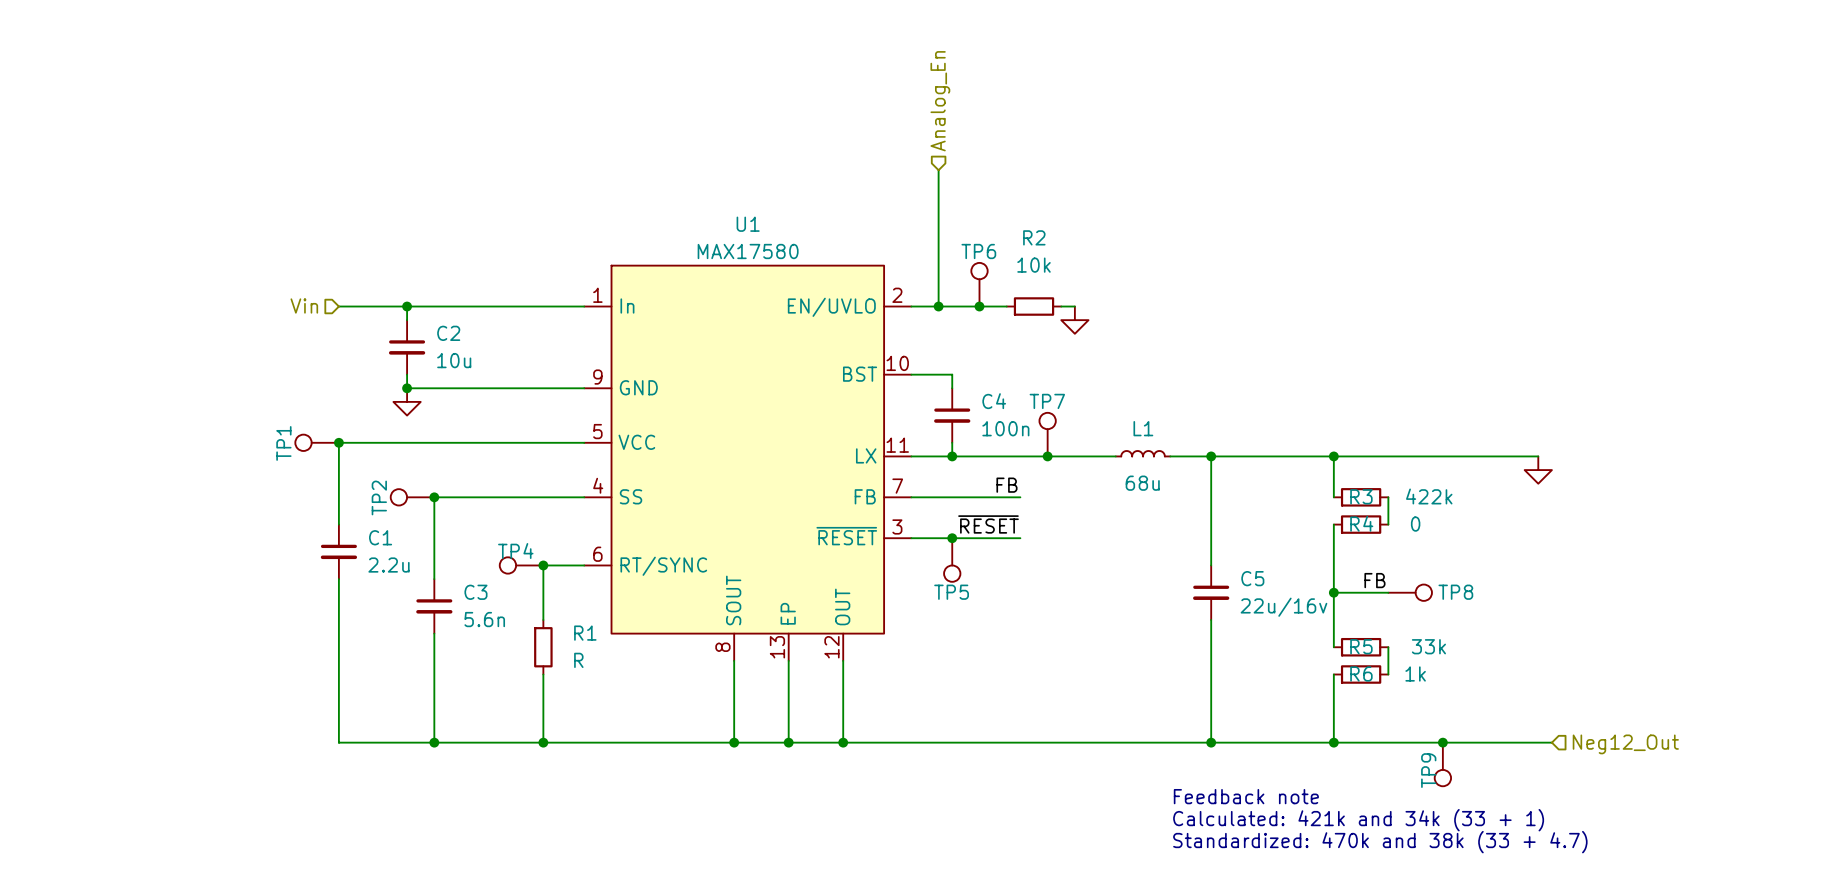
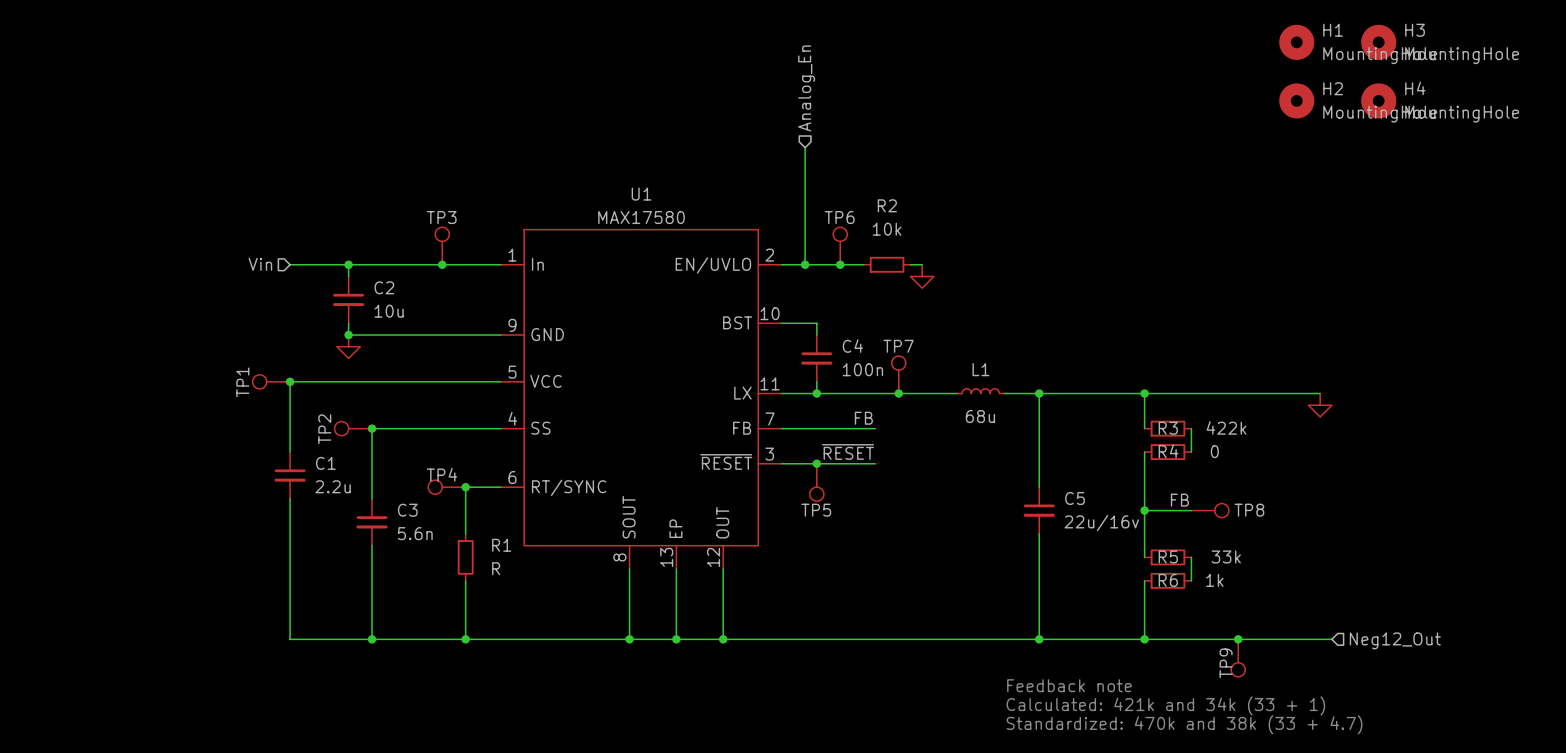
H1: none -> MountingHole (1296, 42)
H3: none -> MountingHole (1378, 42)
H2: none -> MountingHole (1296, 100)
H4: none -> MountingHole (1378, 100)
TP3: none -> (442, 246)
junction: none -> (442, 264)

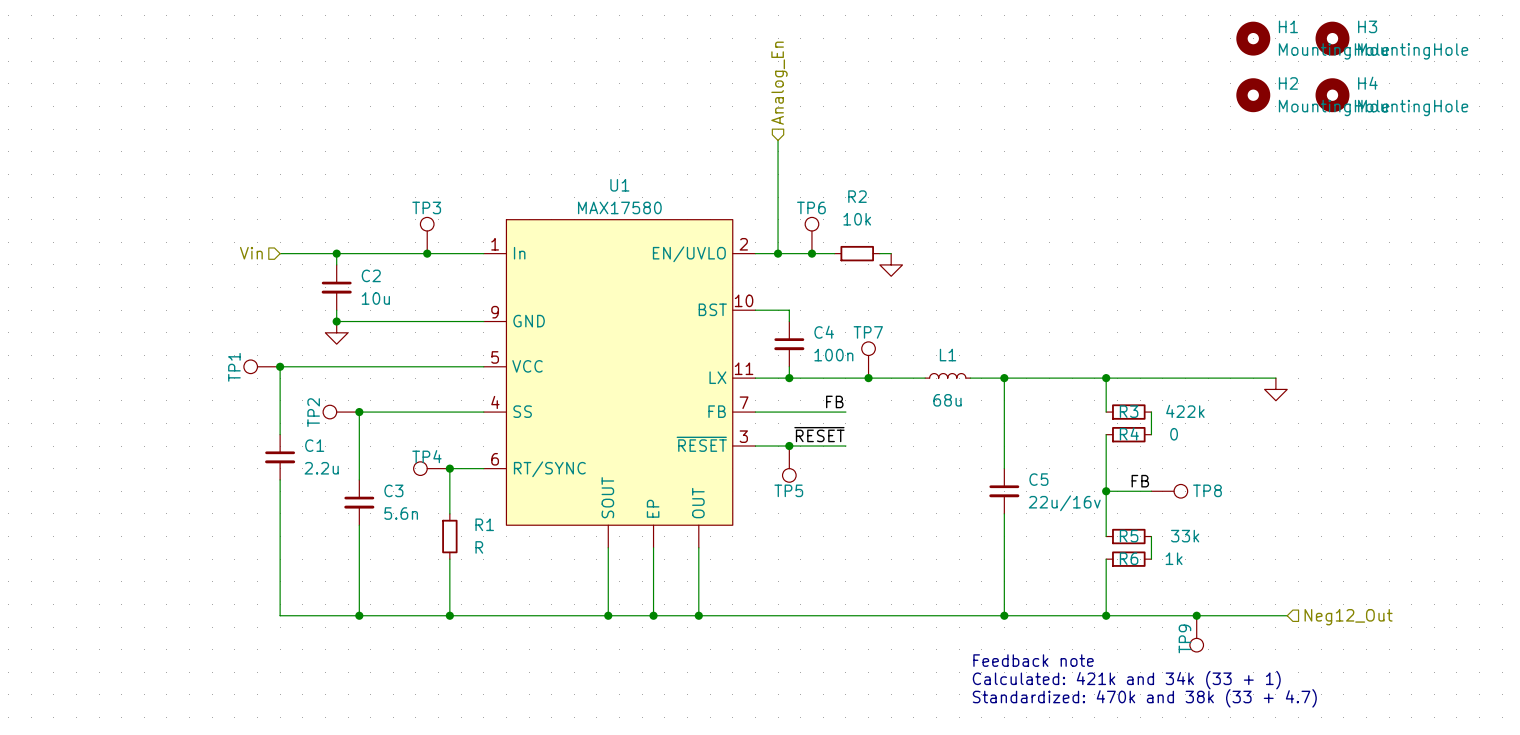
U1 pin number: 8 (619, 557) -> none
U1 pin number: 13 (666, 557) -> none
U1 pin number: 12 (713, 557) -> none

